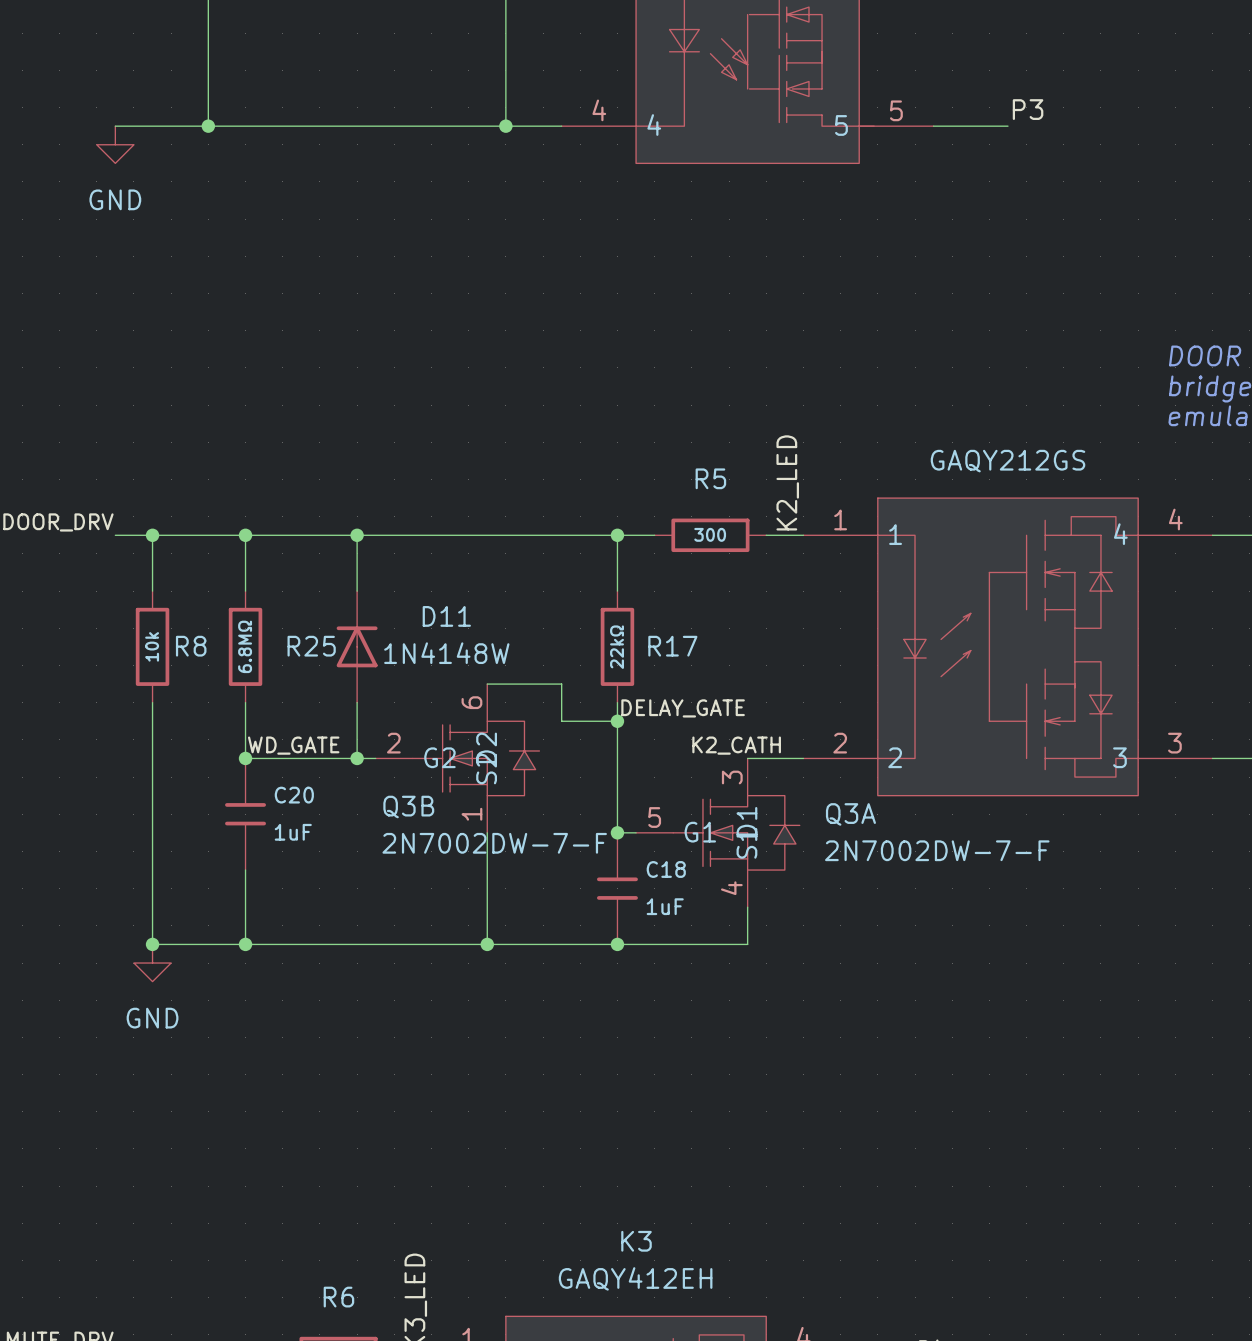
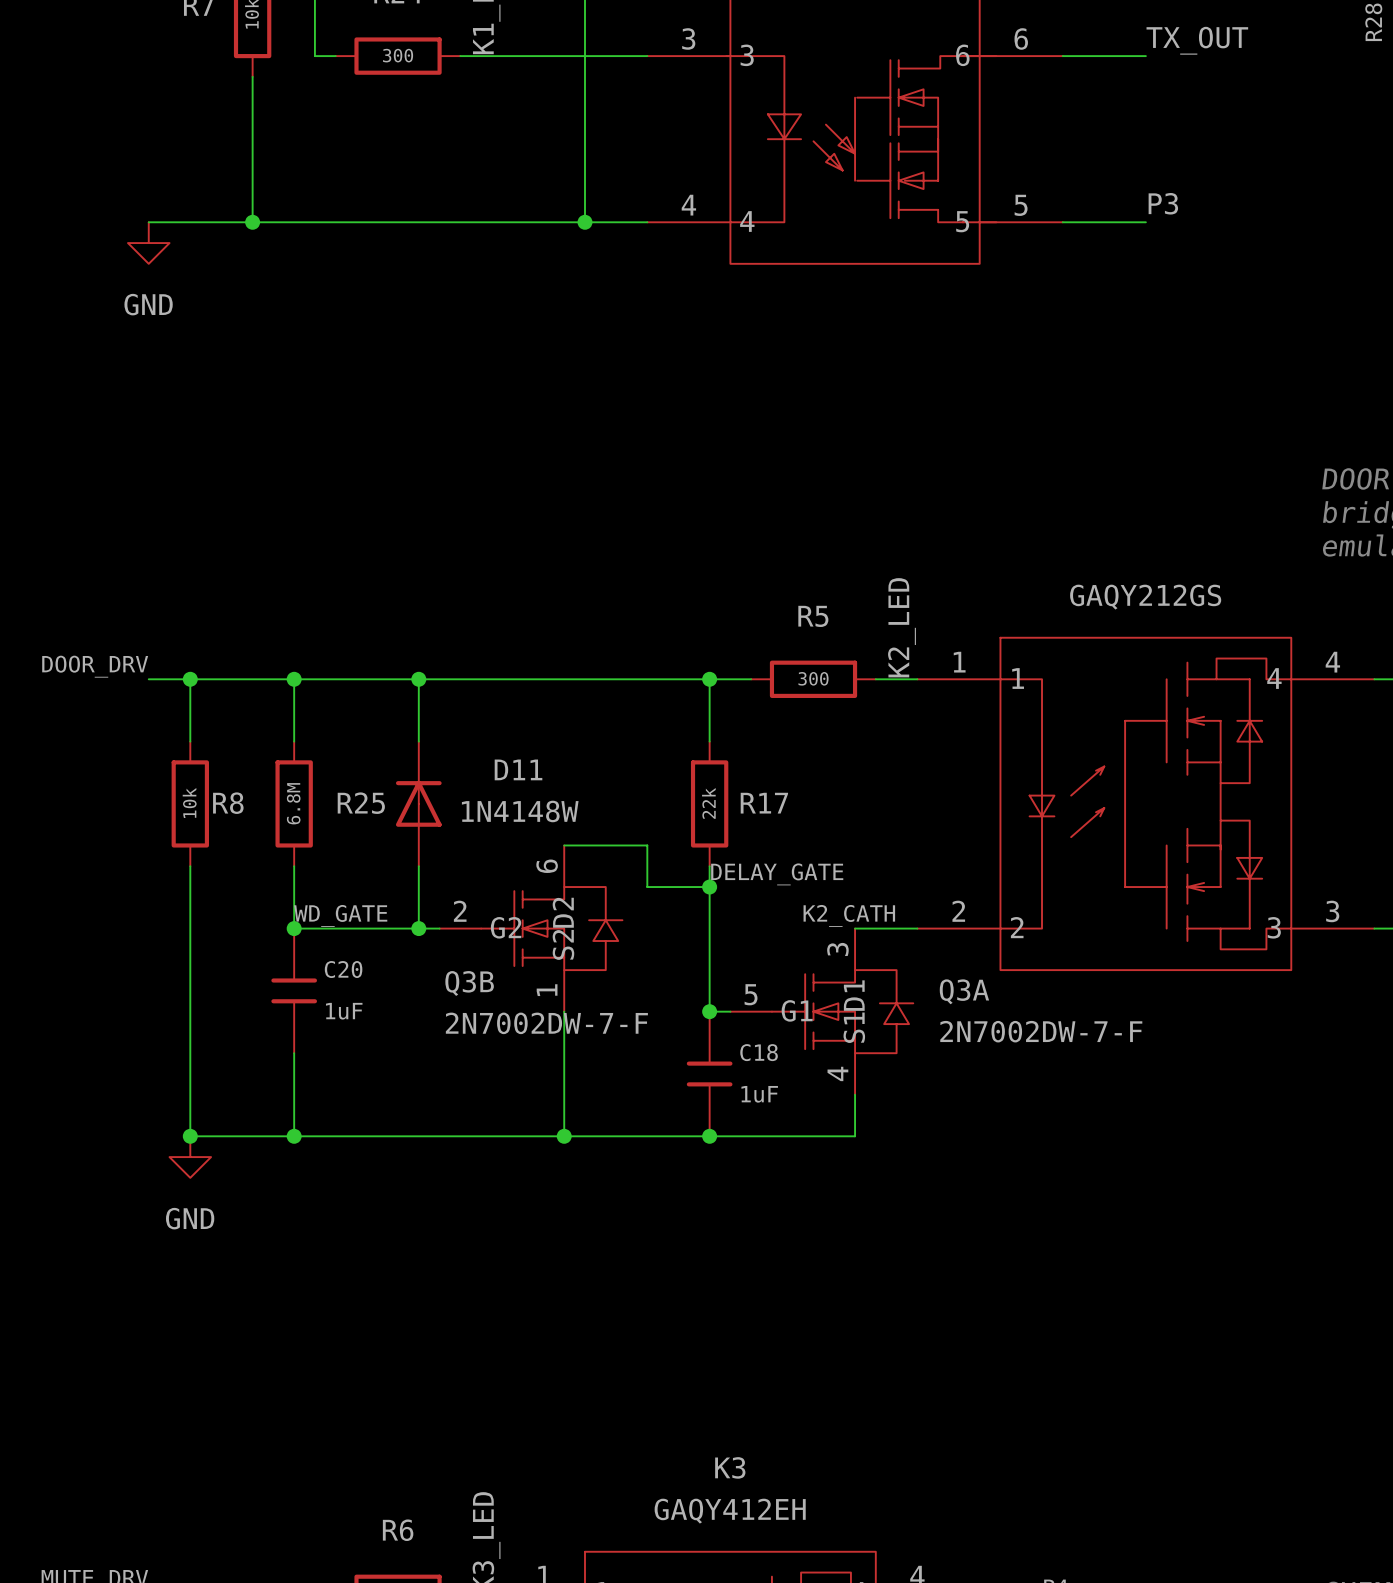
R25 value: 6.8MΩ (245, 646) -> 6.8M (293, 803)
R17 value: 22kΩ (617, 647) -> 22k (708, 803)

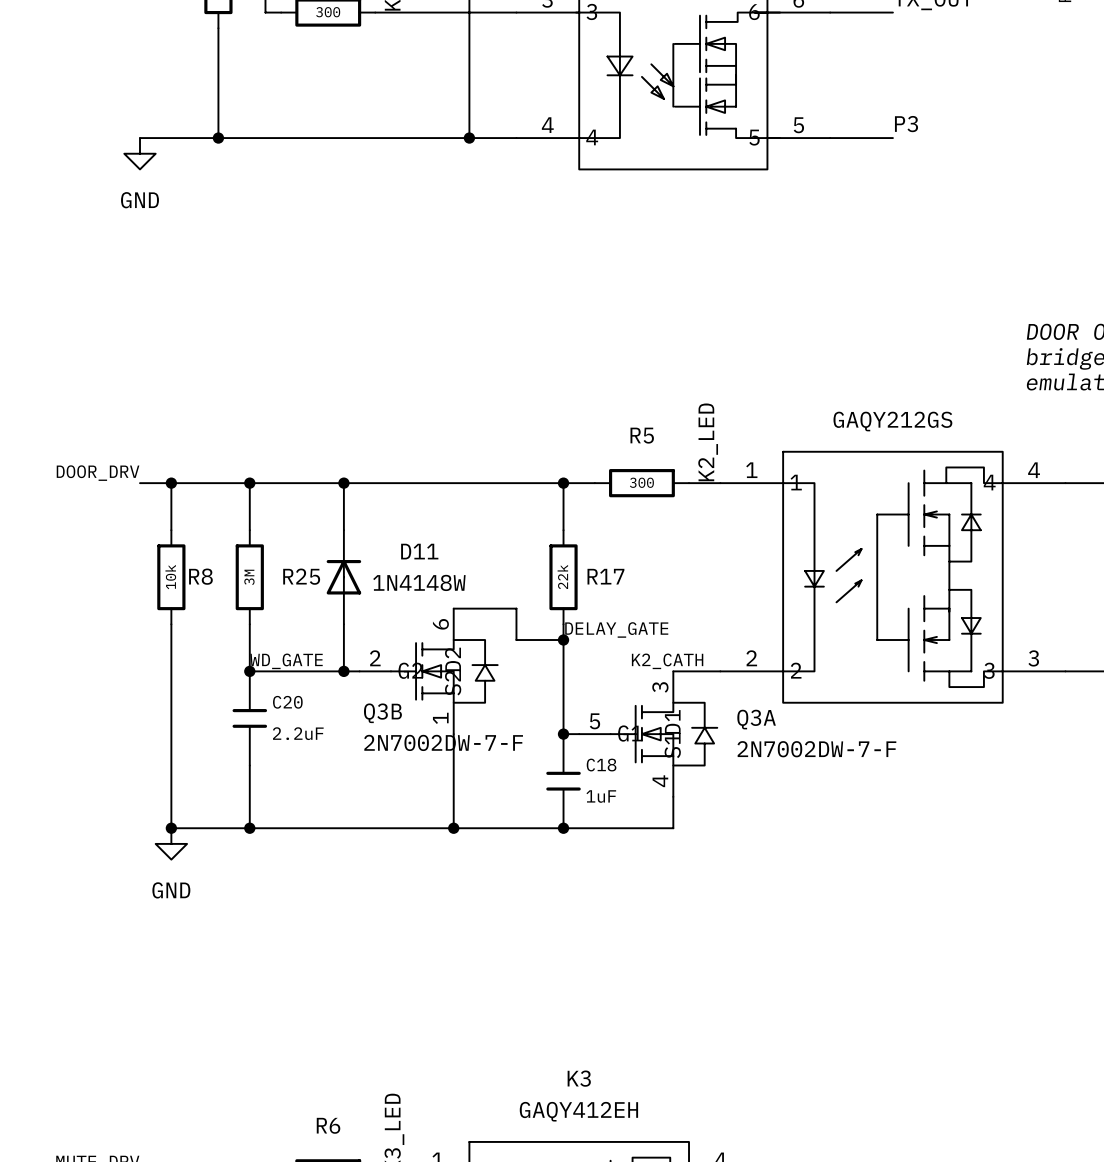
R25 value: 6.8M (293, 803) -> 3M (249, 577)
C20 value: 1uF (344, 1011) -> 2.2uF (298, 733)

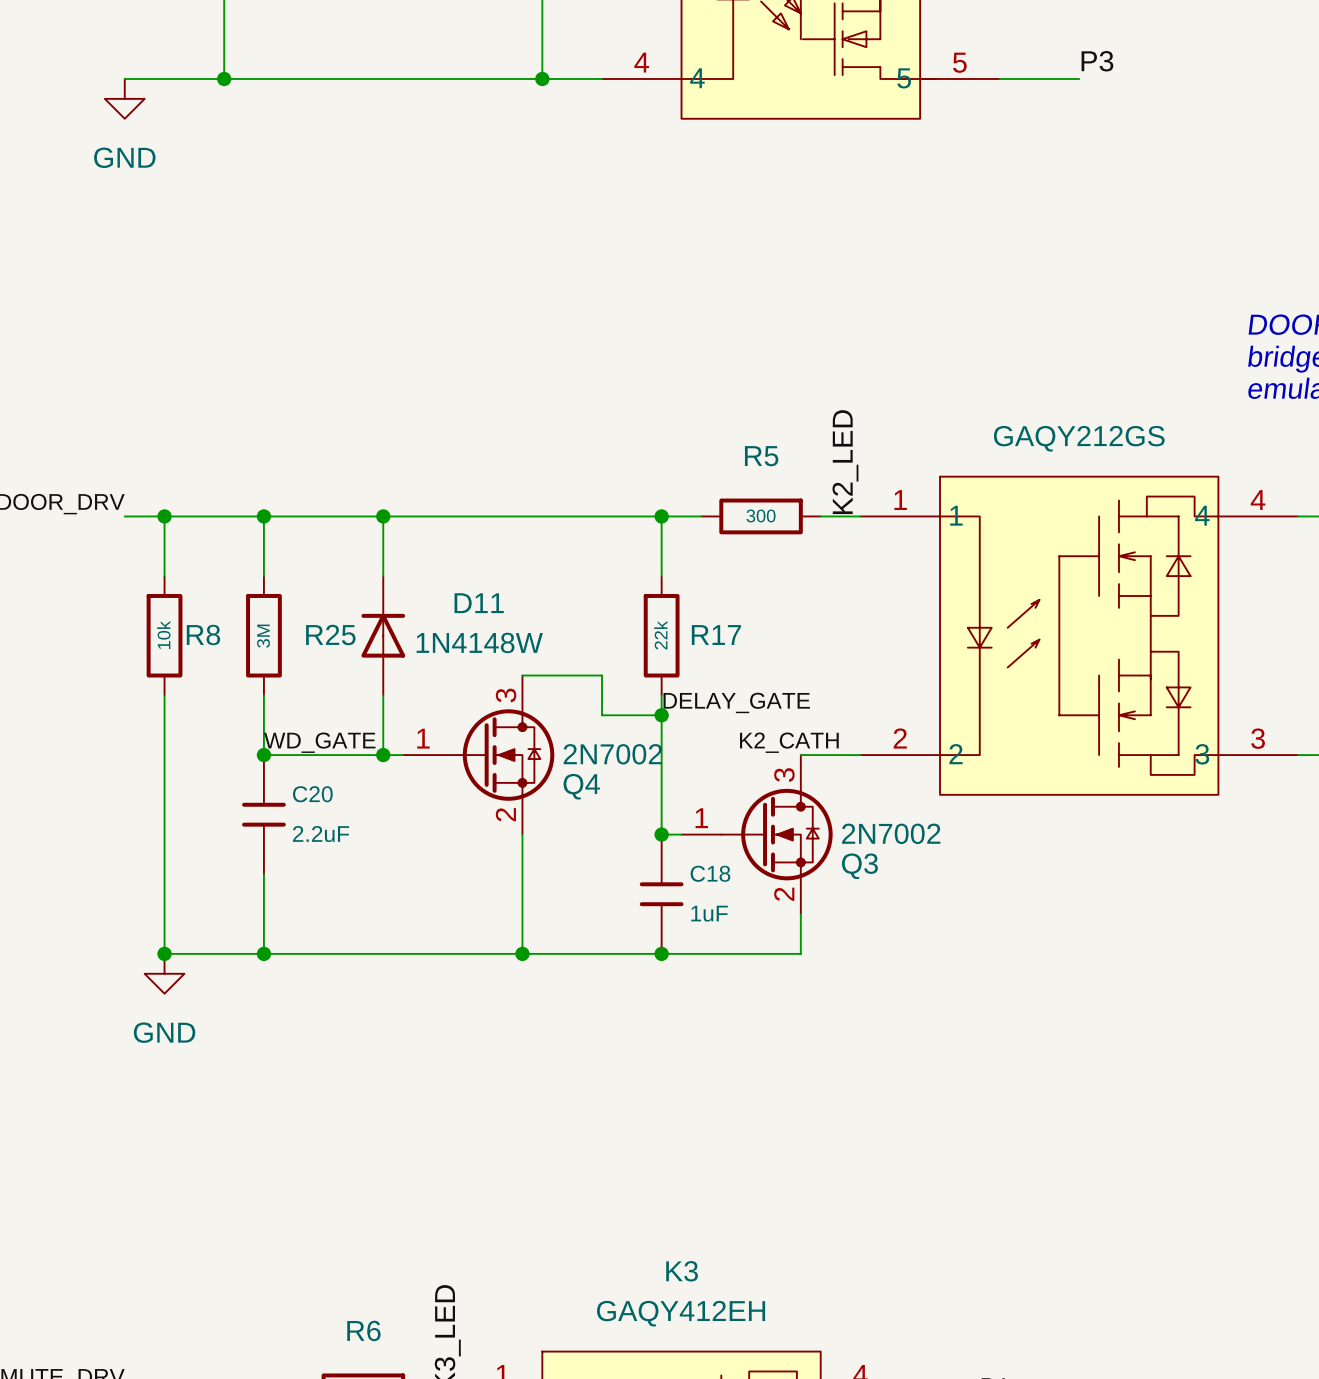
Q4: none -> 2N7002 (478, 755)
Q3B: 2N7002DW-7-F (428, 671) -> none
Q3: none -> 2N7002 (757, 834)
Q3A: 2N7002DW-7-F (648, 734) -> none

